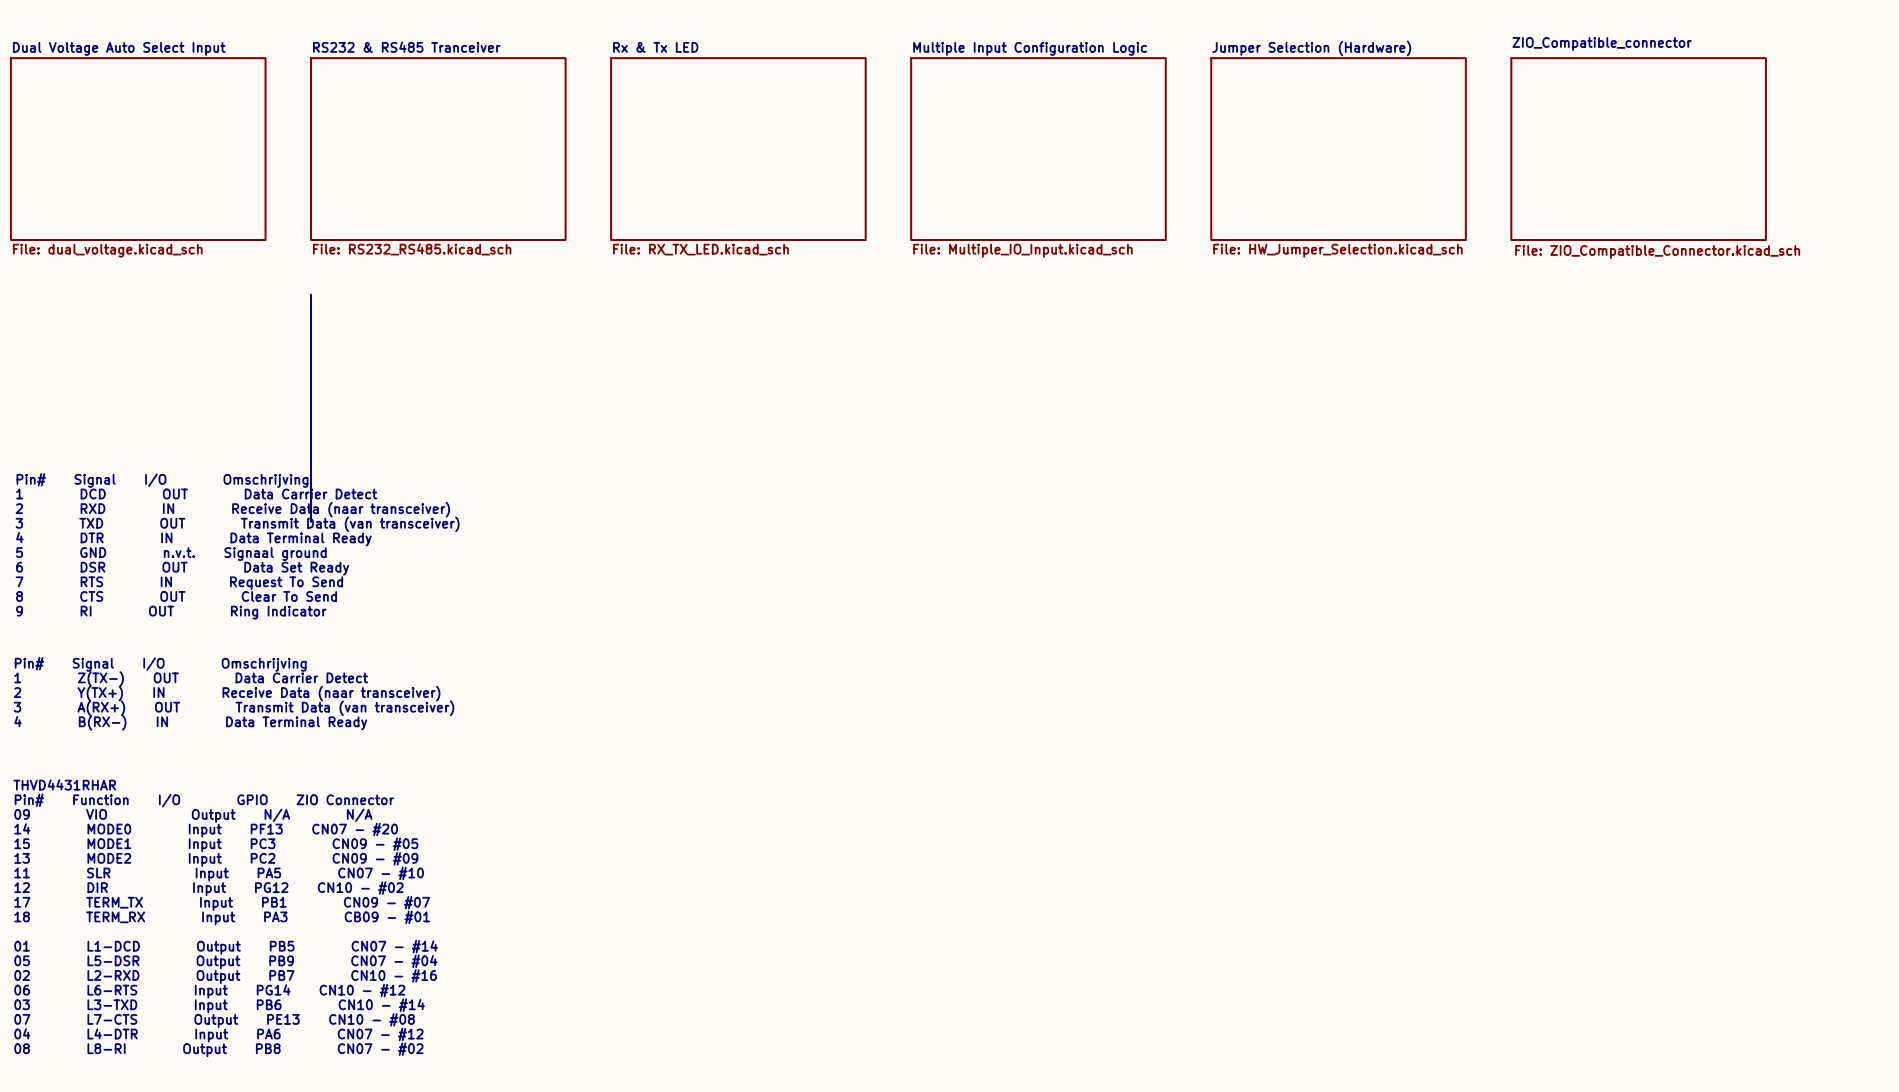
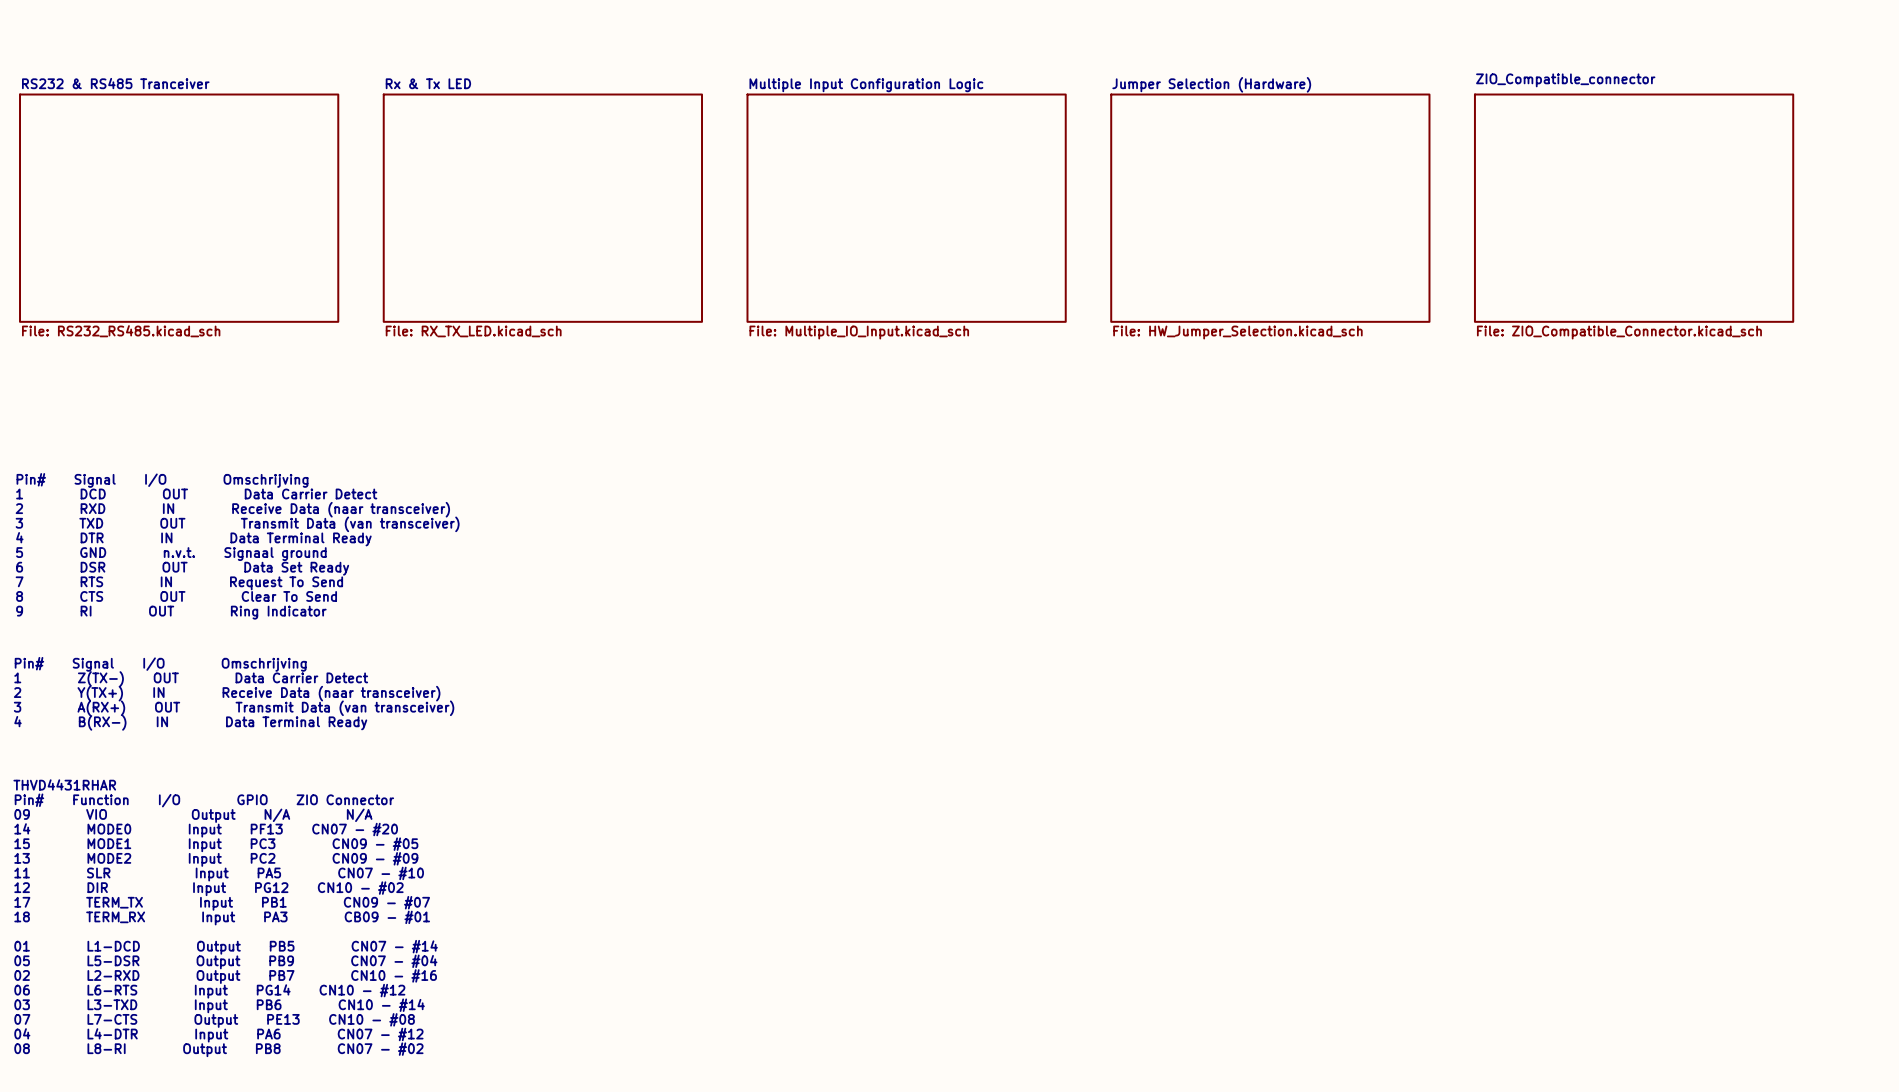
sheet RS232 & RS485 Tranceiver name position: RS232 & RS485 Tranceiver (406, 47) -> RS232 & RS485 Tranceiver (115, 83)
sheet RS232 & RS485 Tranceiver shape: [310, 57, 567, 241] -> [19, 93, 339, 323]
sheet Dual Voltage Auto Select Input: File: dual_voltage.kicad_sch (138, 149) -> none
sheet Rx & Tx LED: File: RX_TX_LED.kicad_sch (738, 149) -> none
sheet Multiple Input Configuration Logic: File: Multiple_IO_Input.kicad_sch (1038, 149) -> none
sheet Jumper Selection (Hardware): File: HW_Jumper_Selection.kicad_sch (1338, 149) -> none
sheet ZIO_Compatible_connector: File: ZIO_Compatible_Connector.kicad_sch (1638, 149) -> none
sheet Rx & Tx LED: none -> File: RX_TX_LED.kicad_sch (542, 208)
sheet Multiple Input Configuration Logic: none -> File: Multiple_IO_Input.kicad_sch (906, 208)
sheet Jumper Selection (Hardware): none -> File: HW_Jumper_Selection.kicad_sch (1270, 208)
sheet ZIO_Compatible_connector: none -> File: ZIO_Compatible_Connector.kicad_sch (1634, 208)
sheet RS232 & RS485 Tranceiver value position: File: RS232_RS485.kicad_sch (412, 249) -> File: RS232_RS485.kicad_sch (121, 331)
line: (310, 294) (310, 521) -> none

